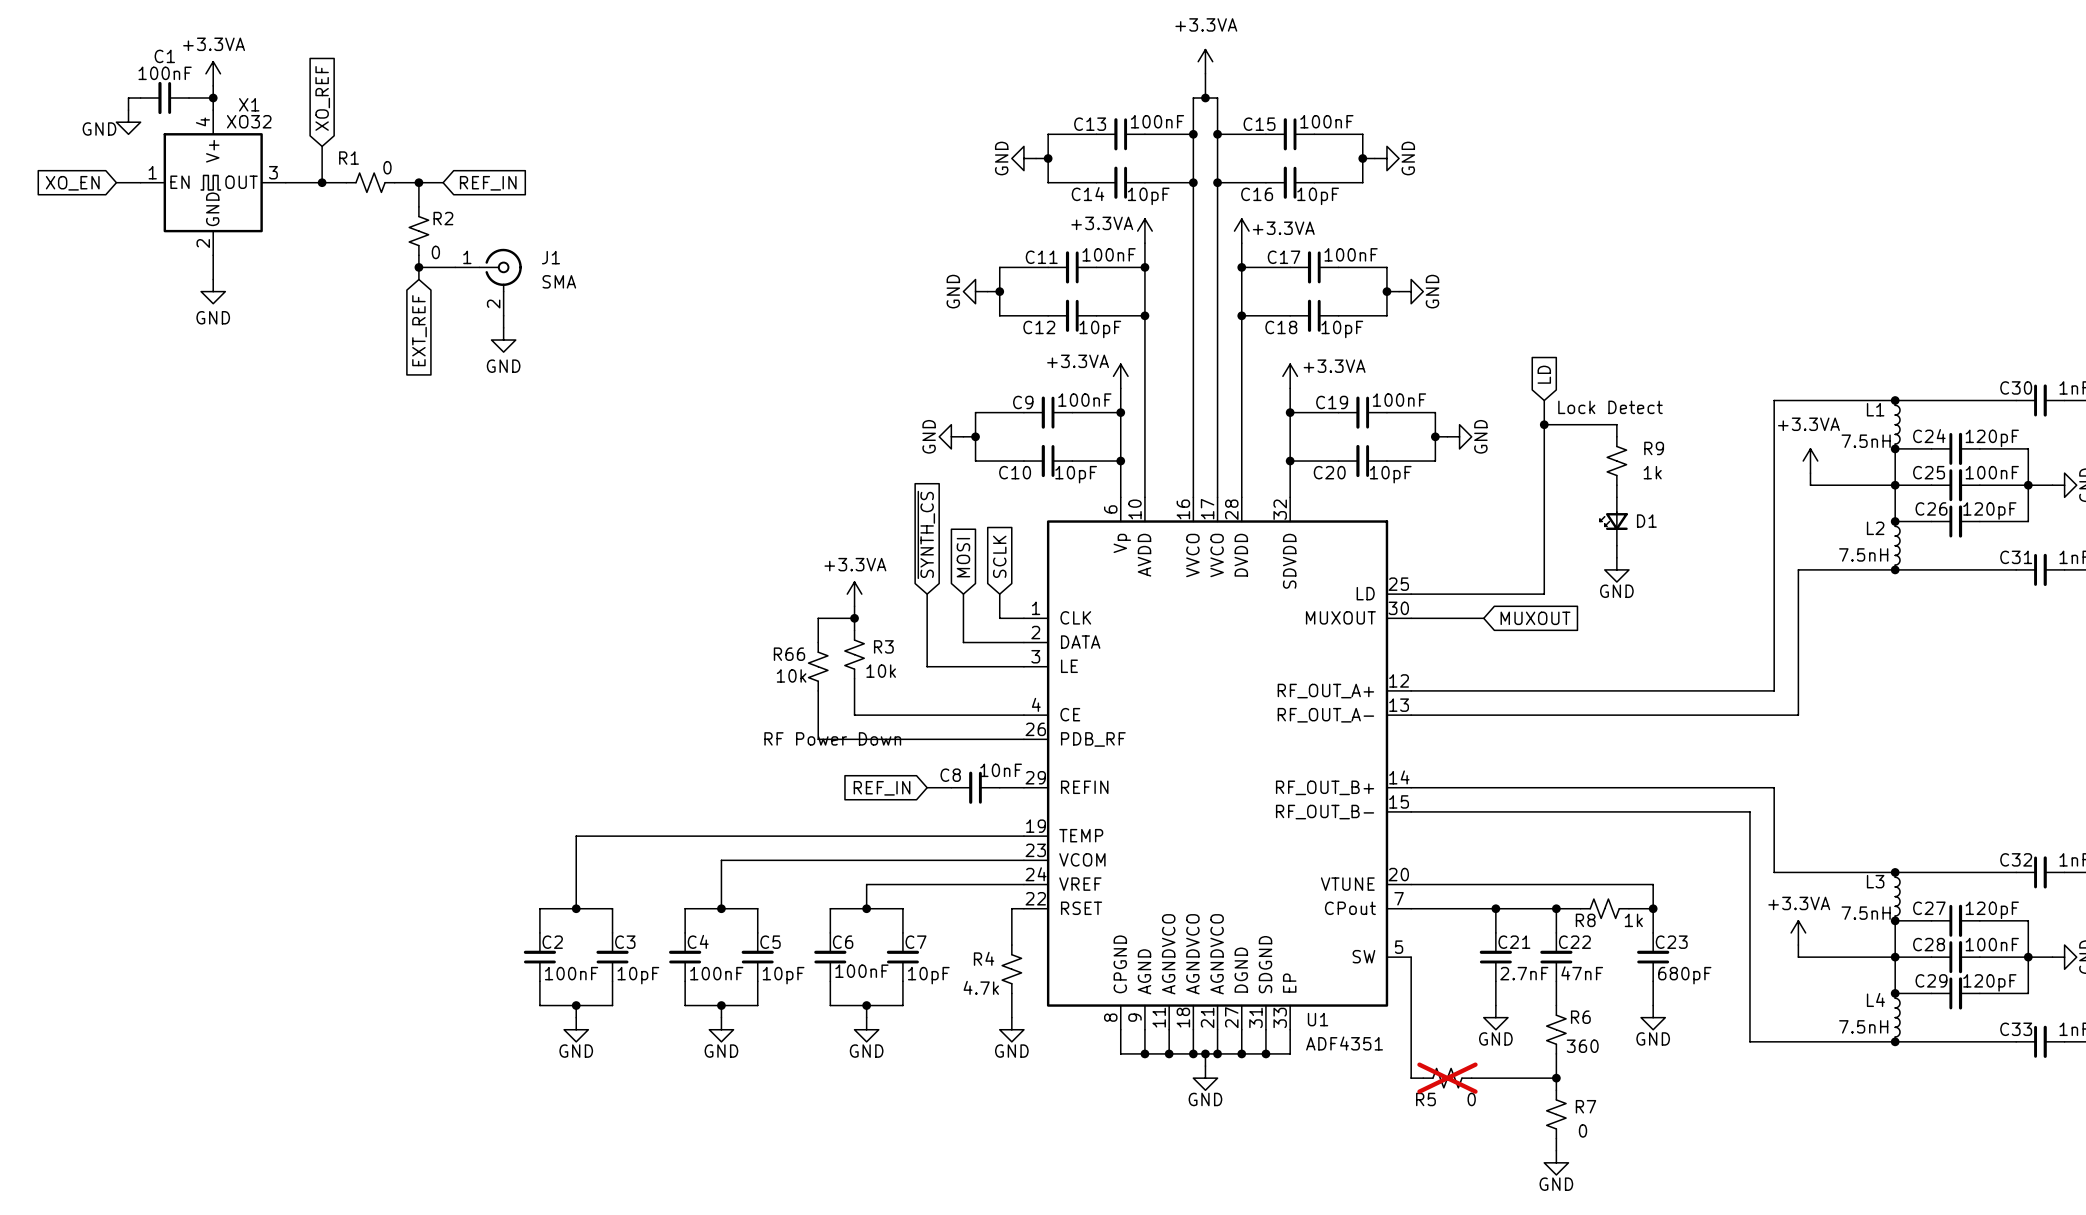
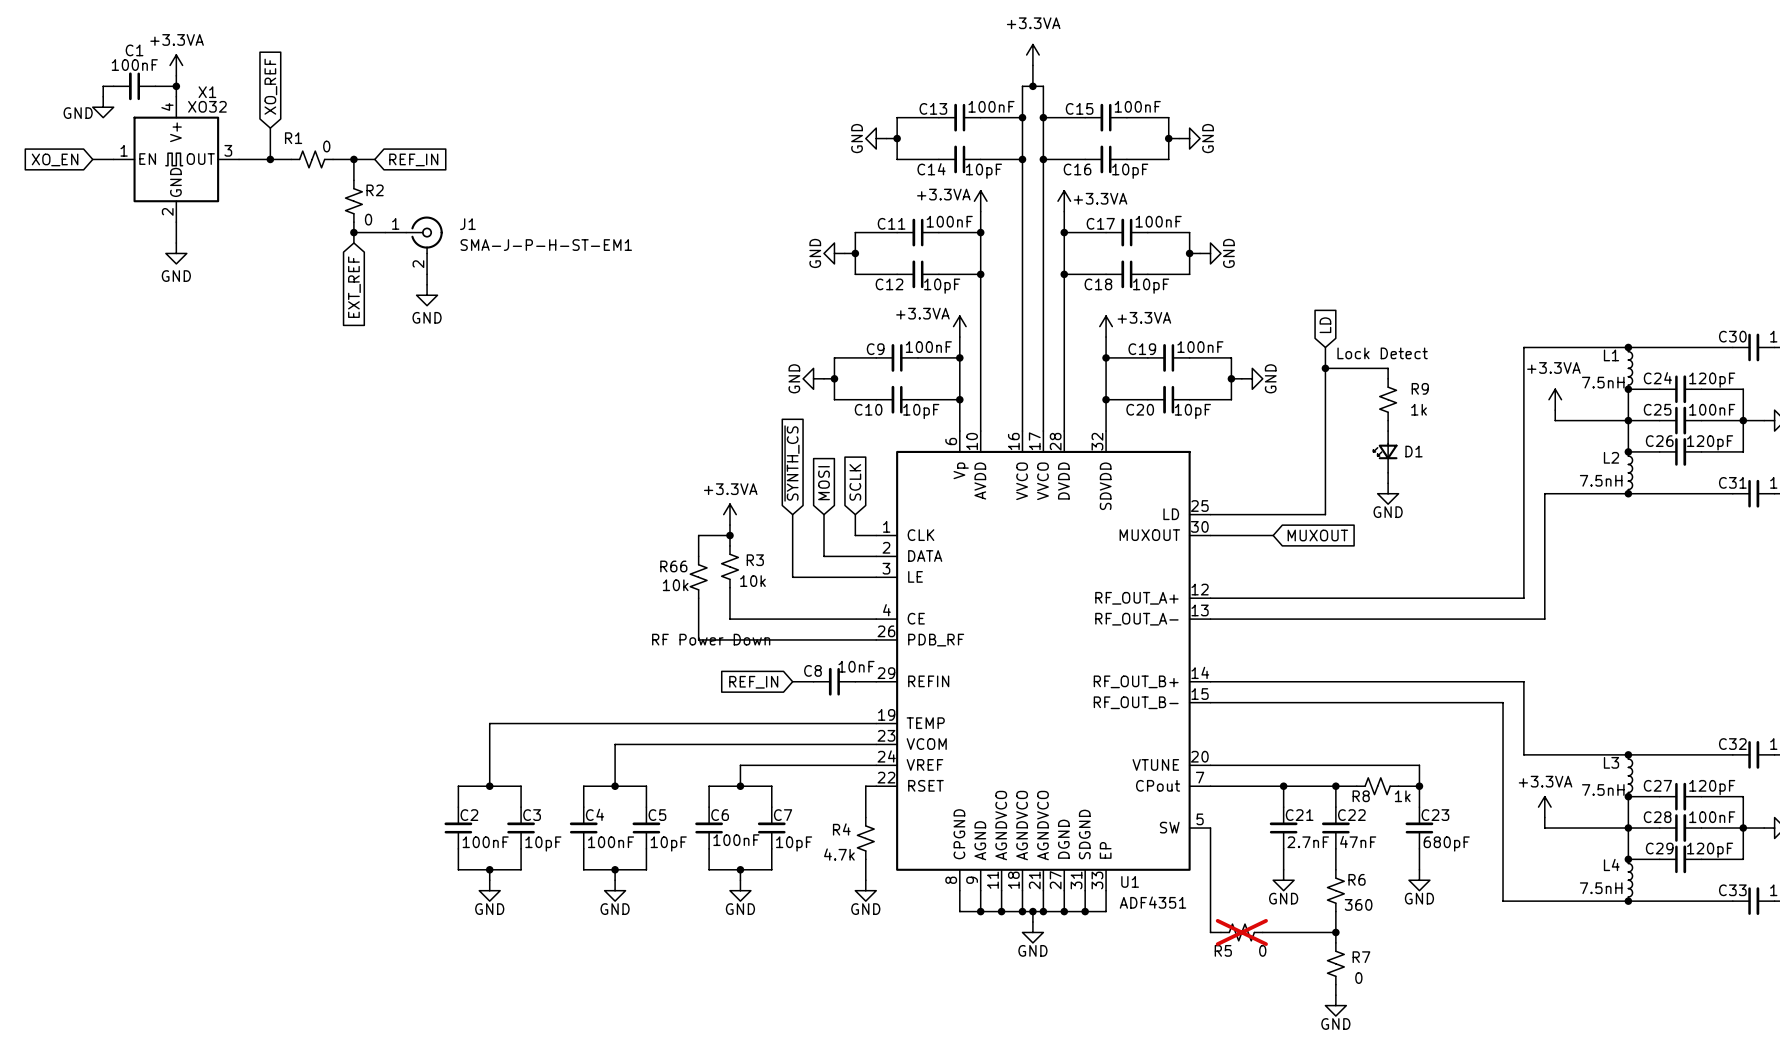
J1 value: SMA (559, 281) -> SMA-J-P-H-ST-EM1 (546, 245)

